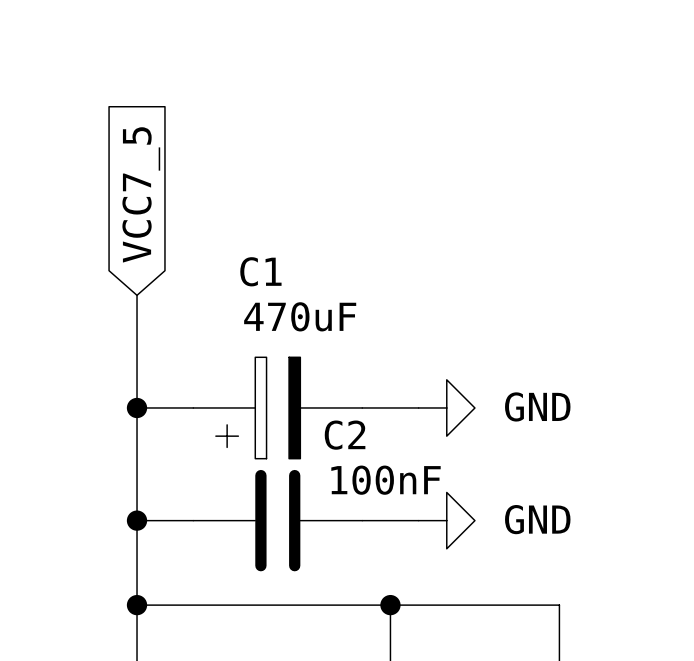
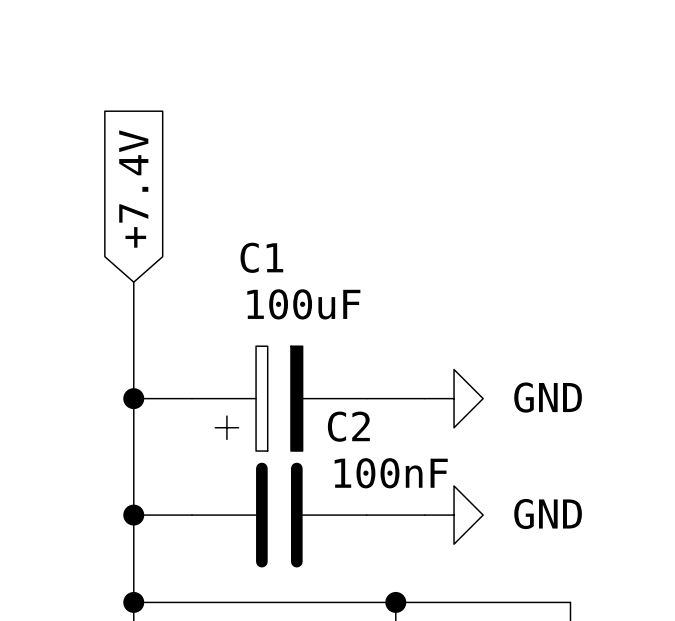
global label: VCC7_5 (141, 194) -> +7.4V (133, 189)
C1 value: 470uF (300, 316) -> 100uF (303, 304)

